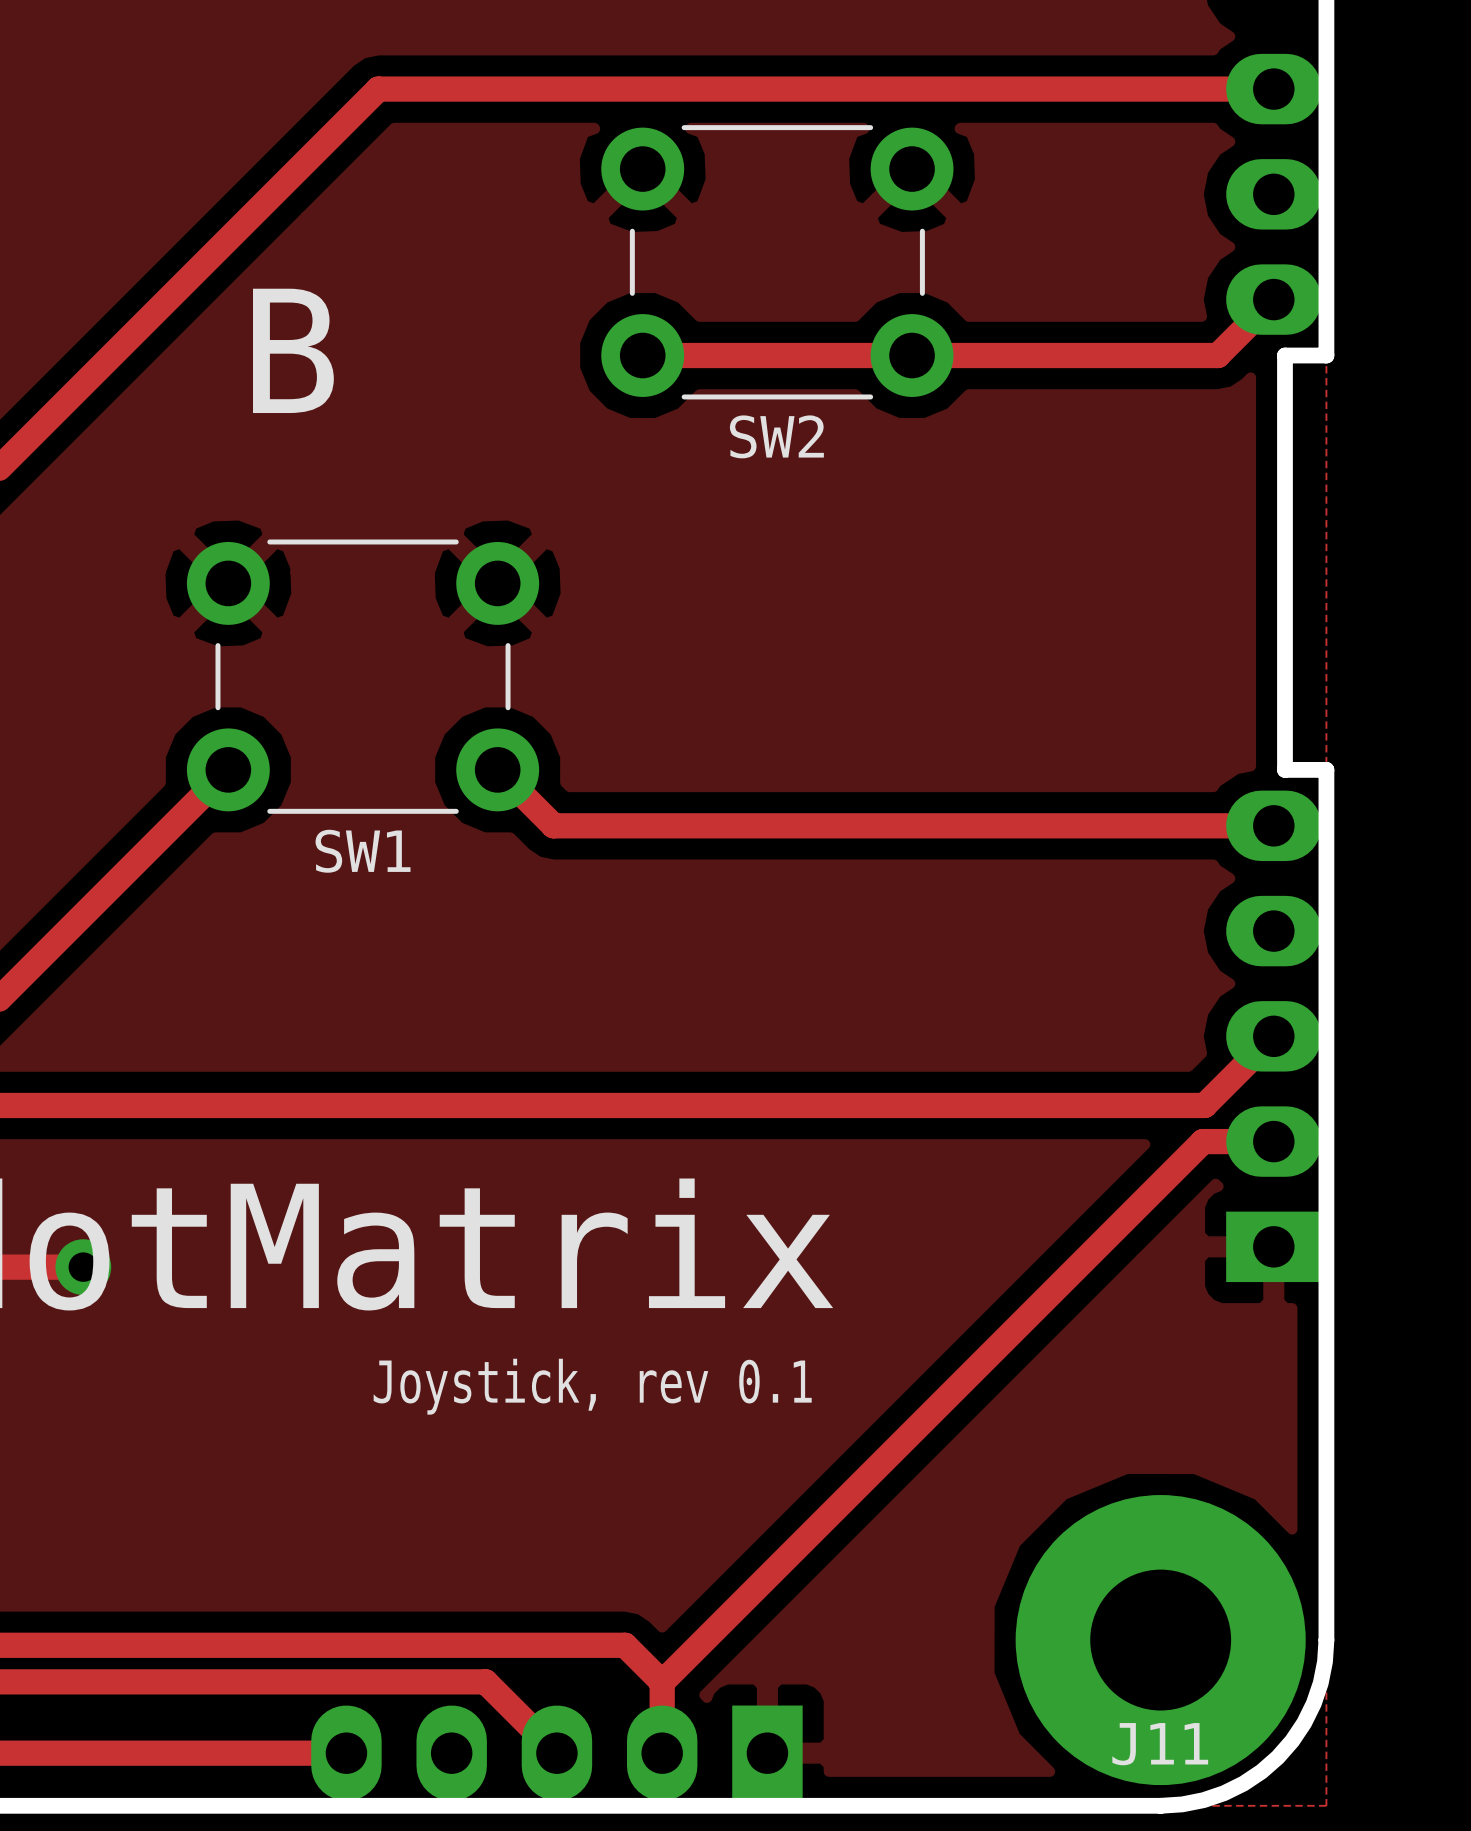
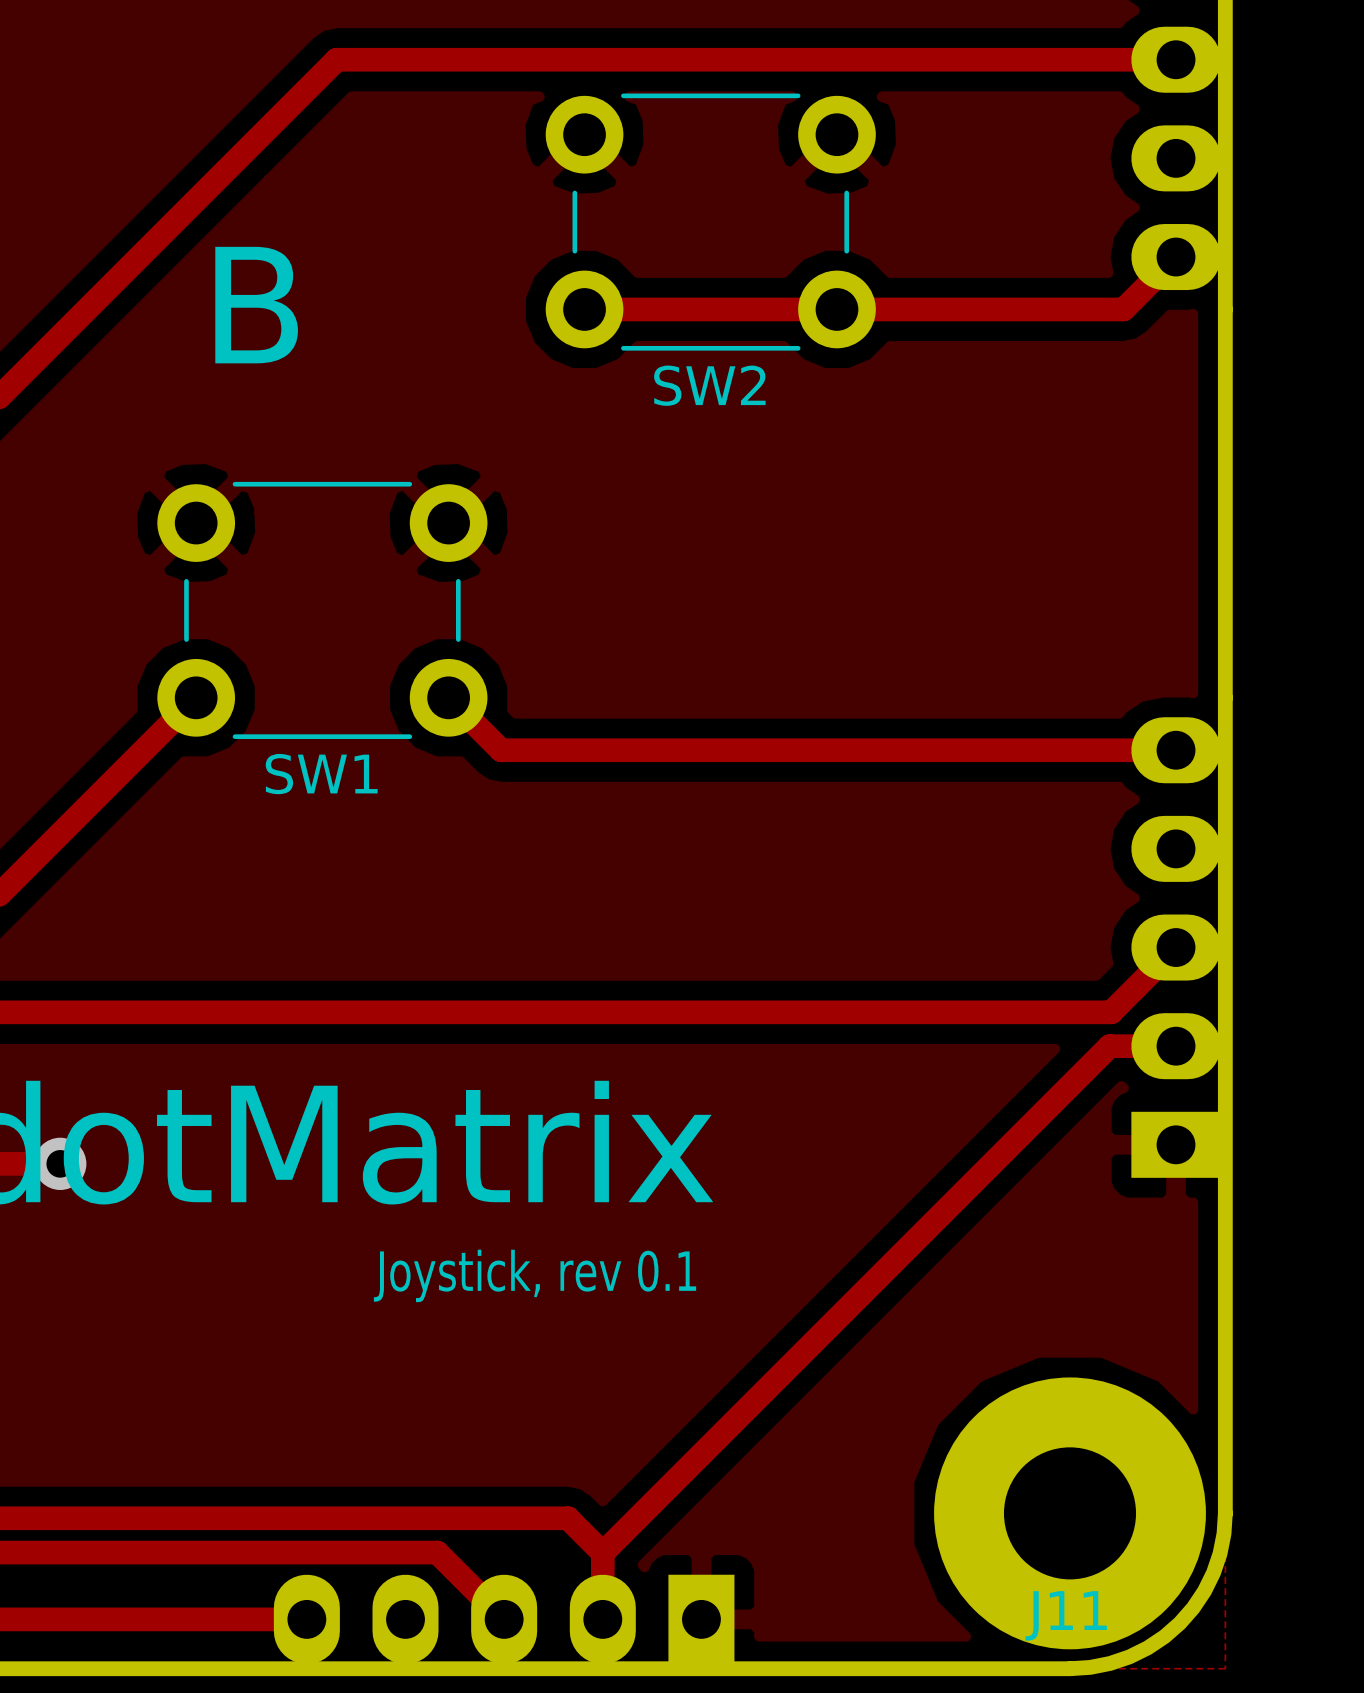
board edge: (1326, 355) (1284, 355) (1284, 769) (1326, 769) -> (1225, 309) (1225, 697)

